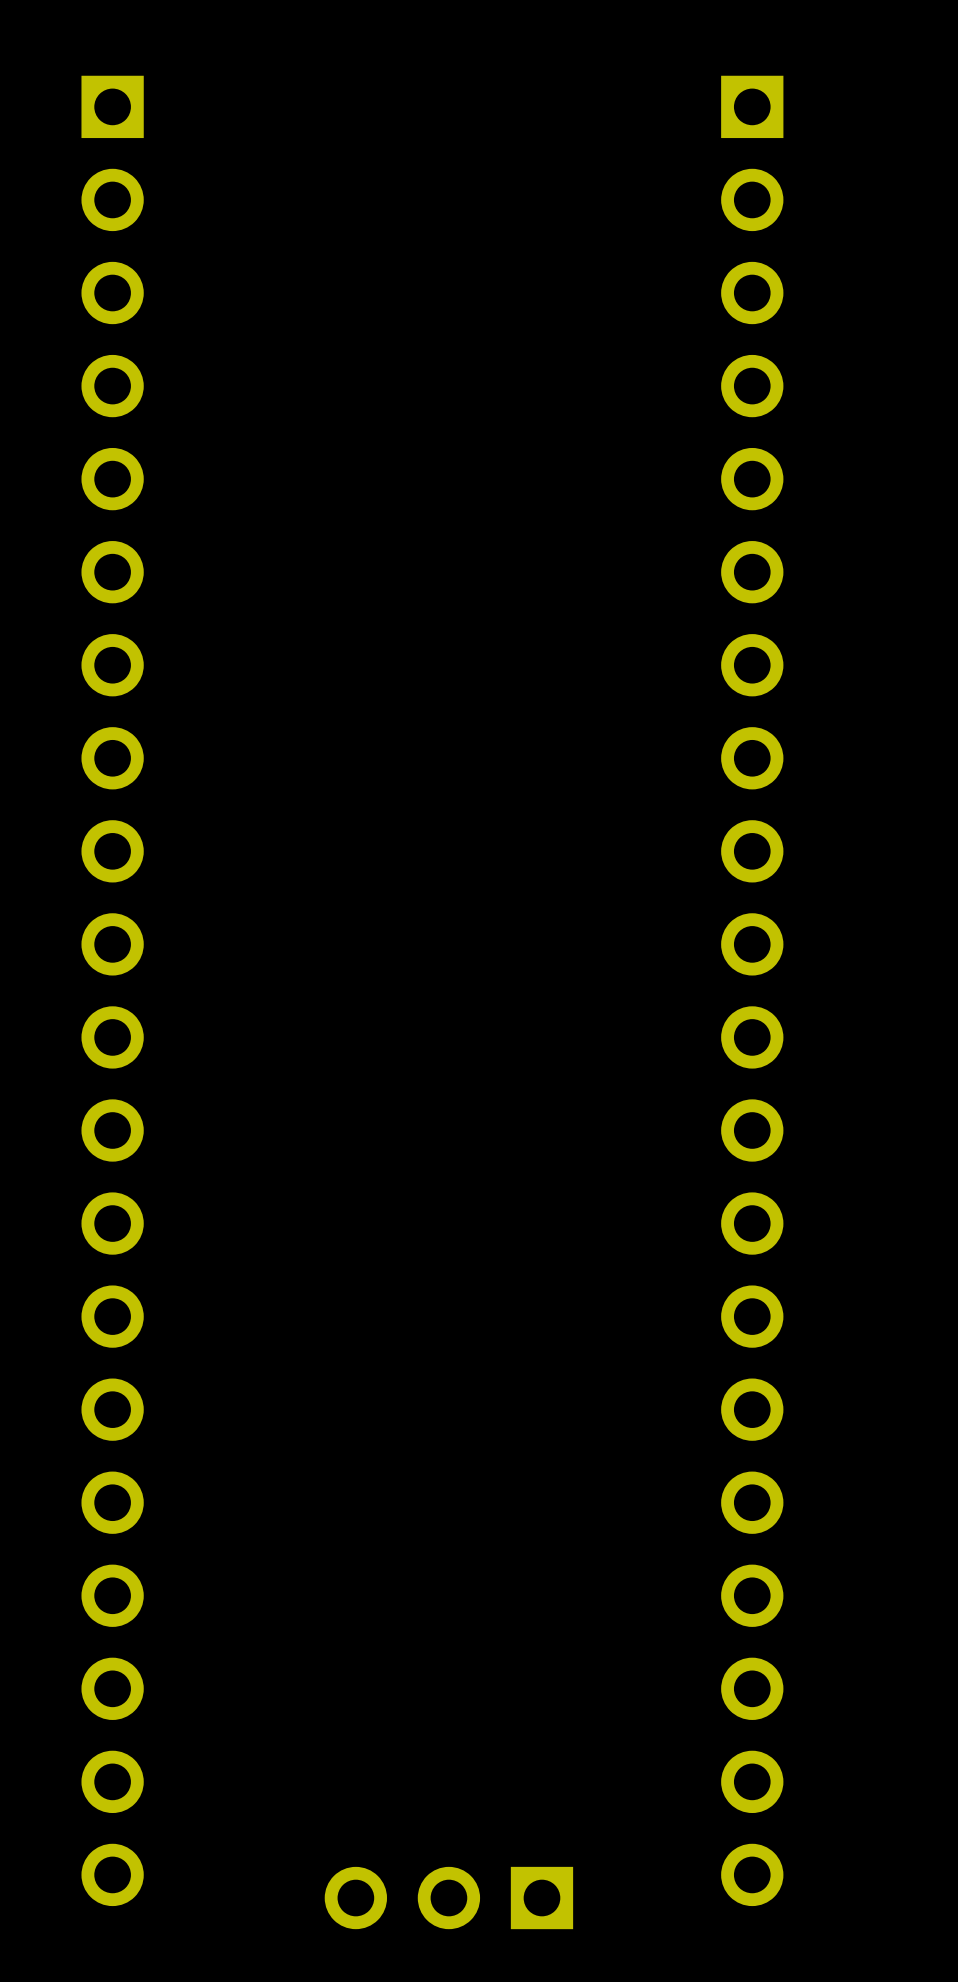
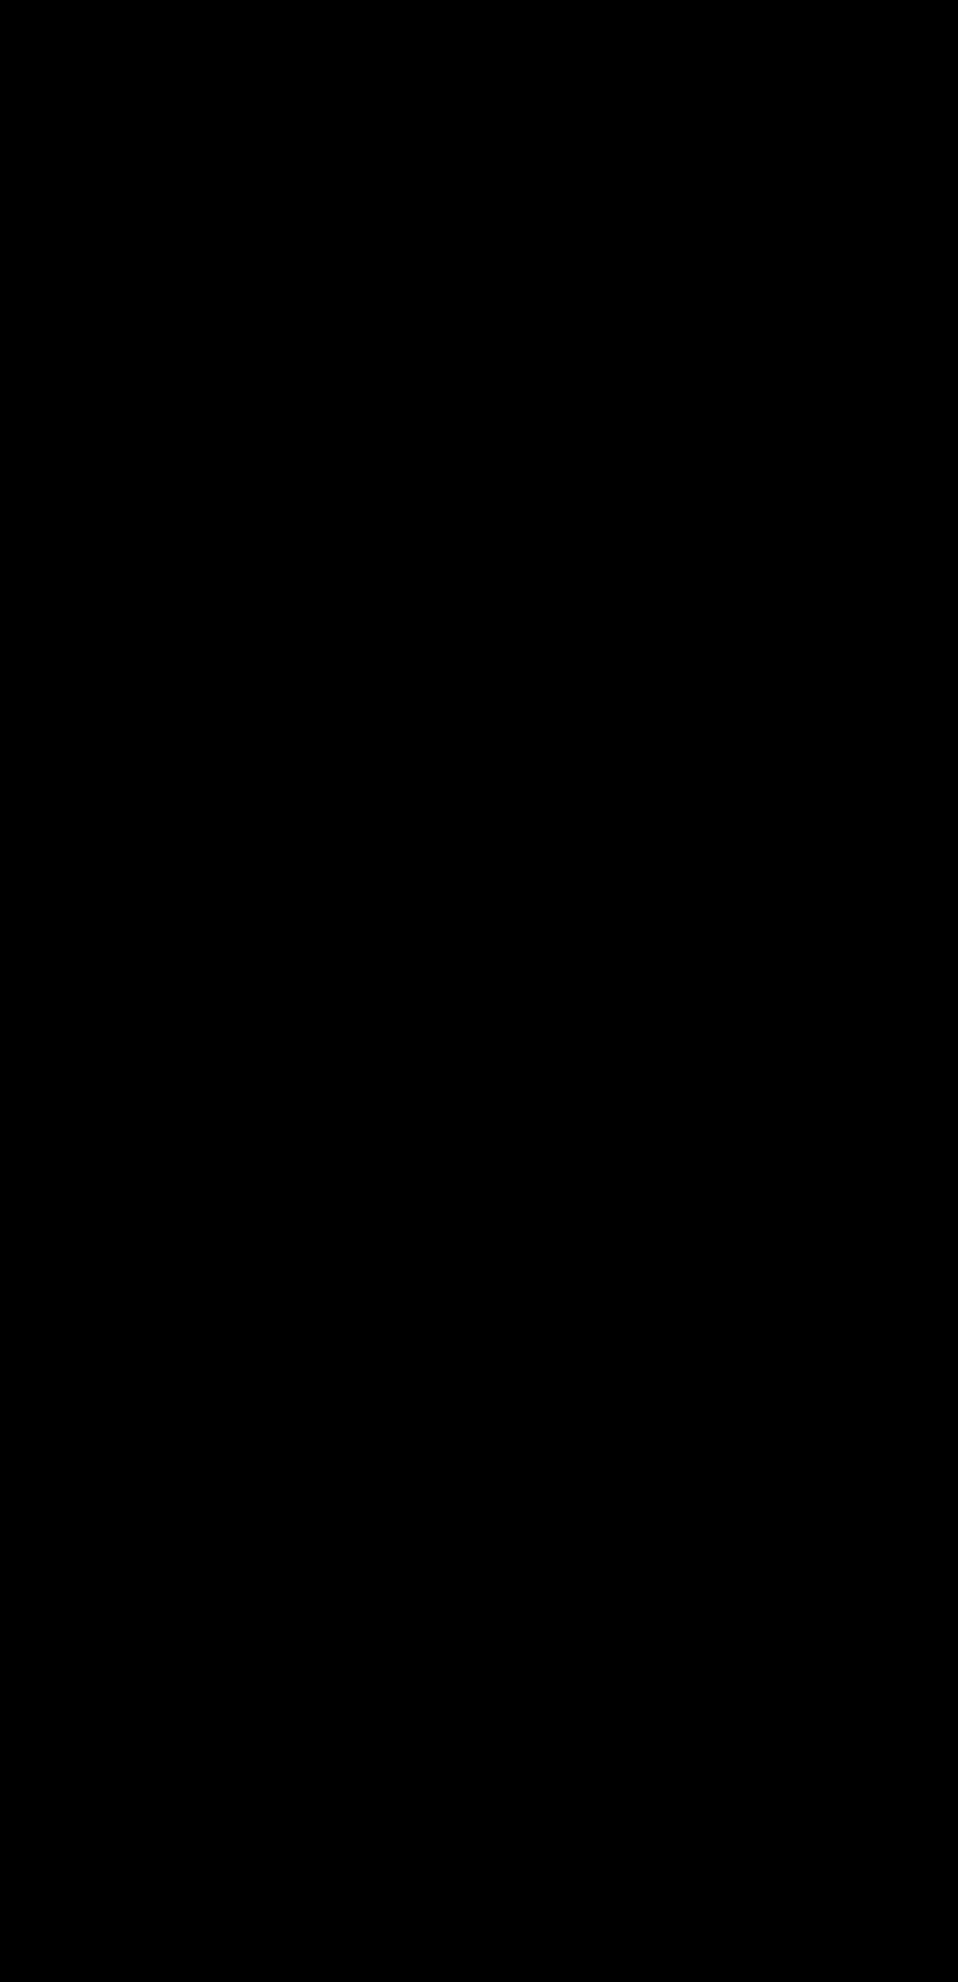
part: (112, 990) -> none
part: (752, 990) -> none
part: (448, 1898) -> none

